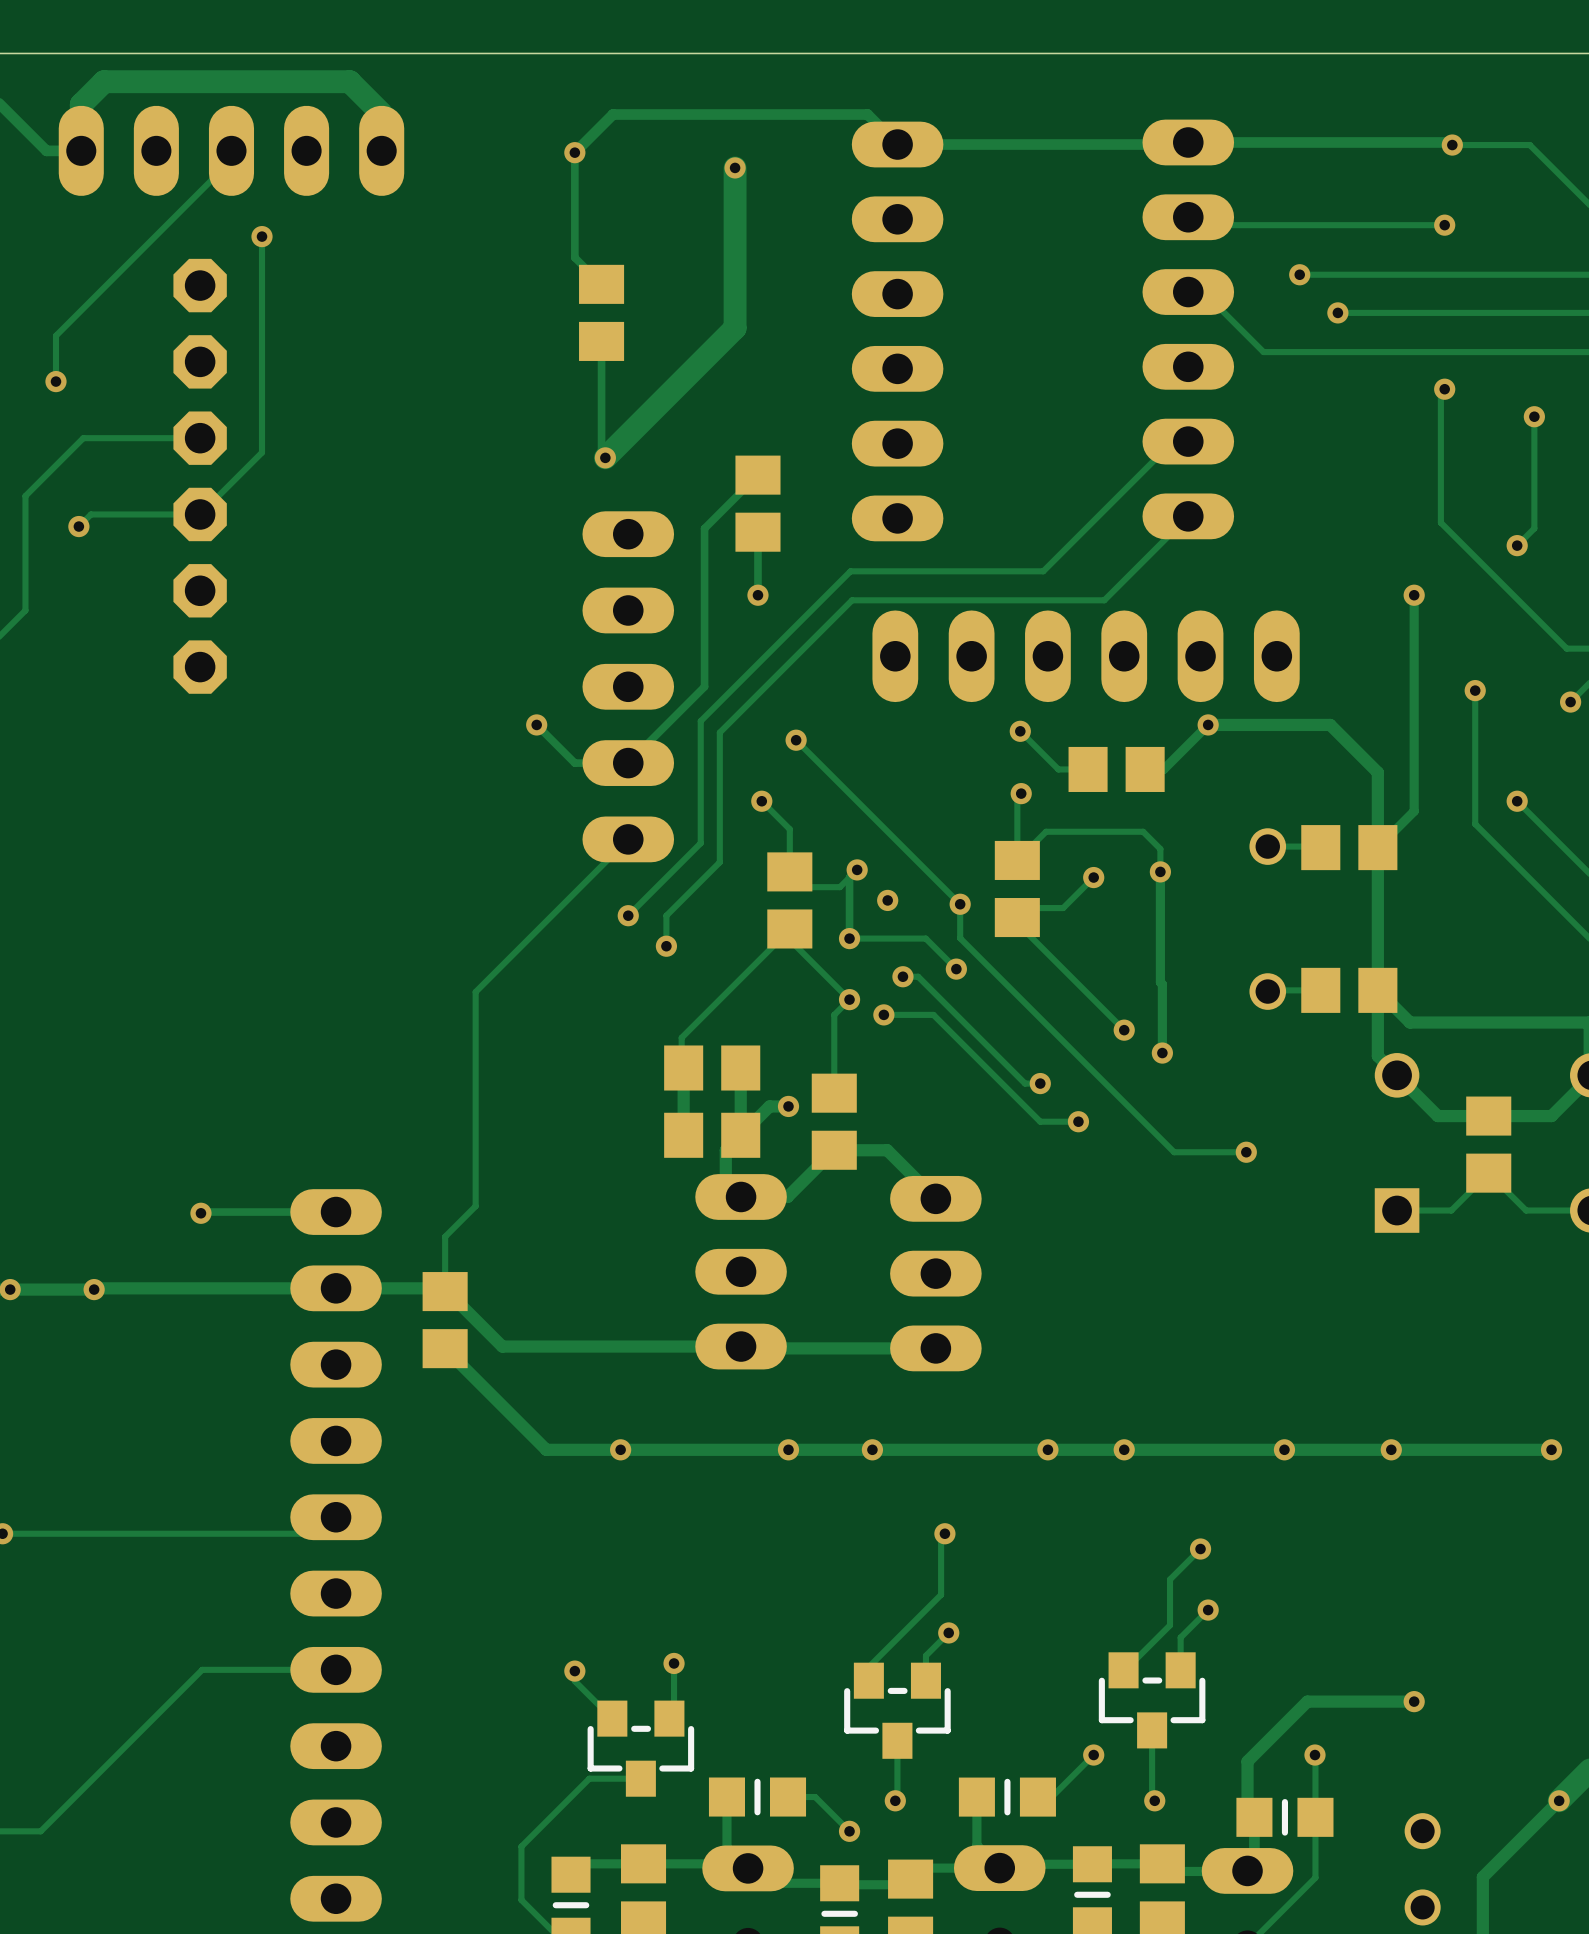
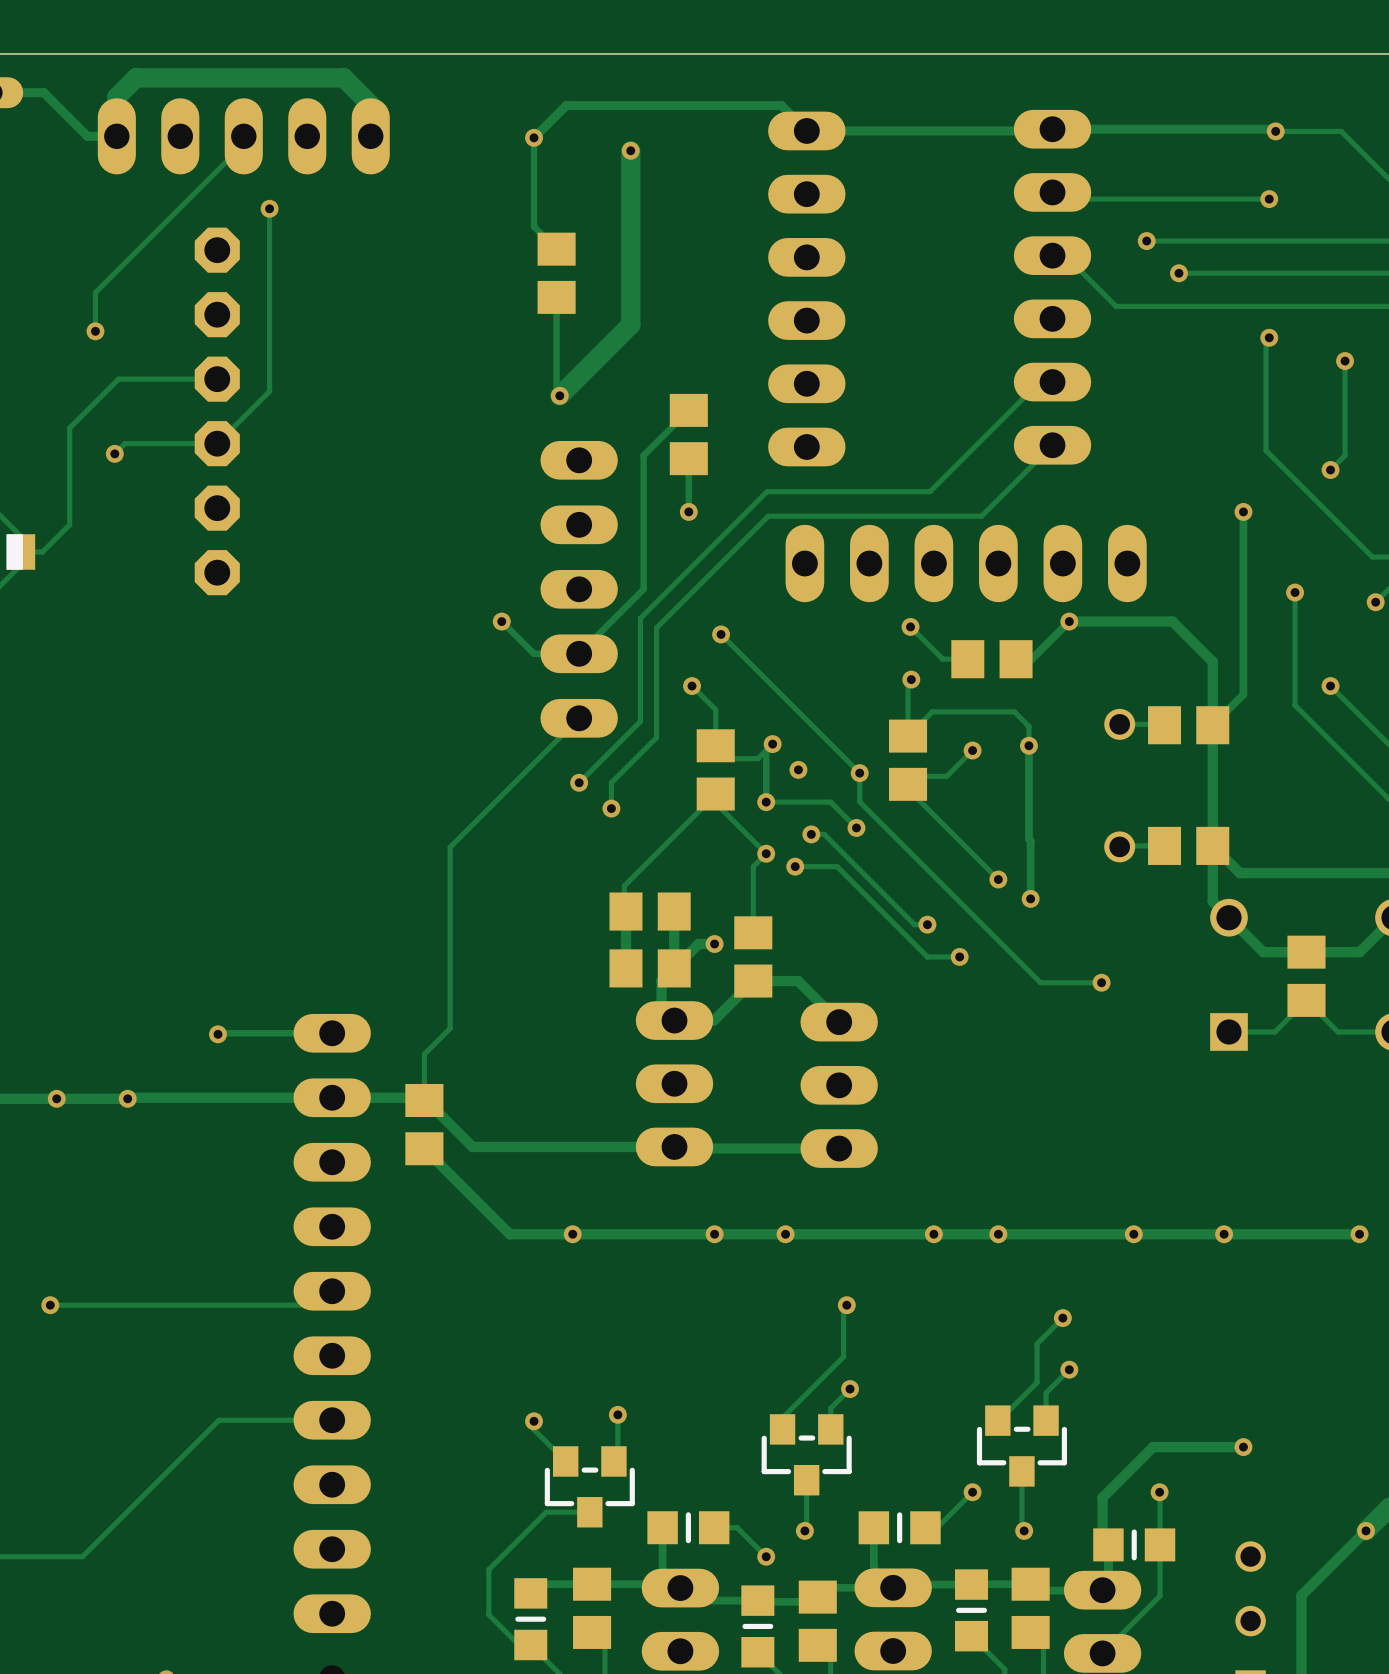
track: (735, 167) (735, 328) (689, 373) -> (630, 150) (630, 324)
via position: (735, 167) -> (630, 150)

